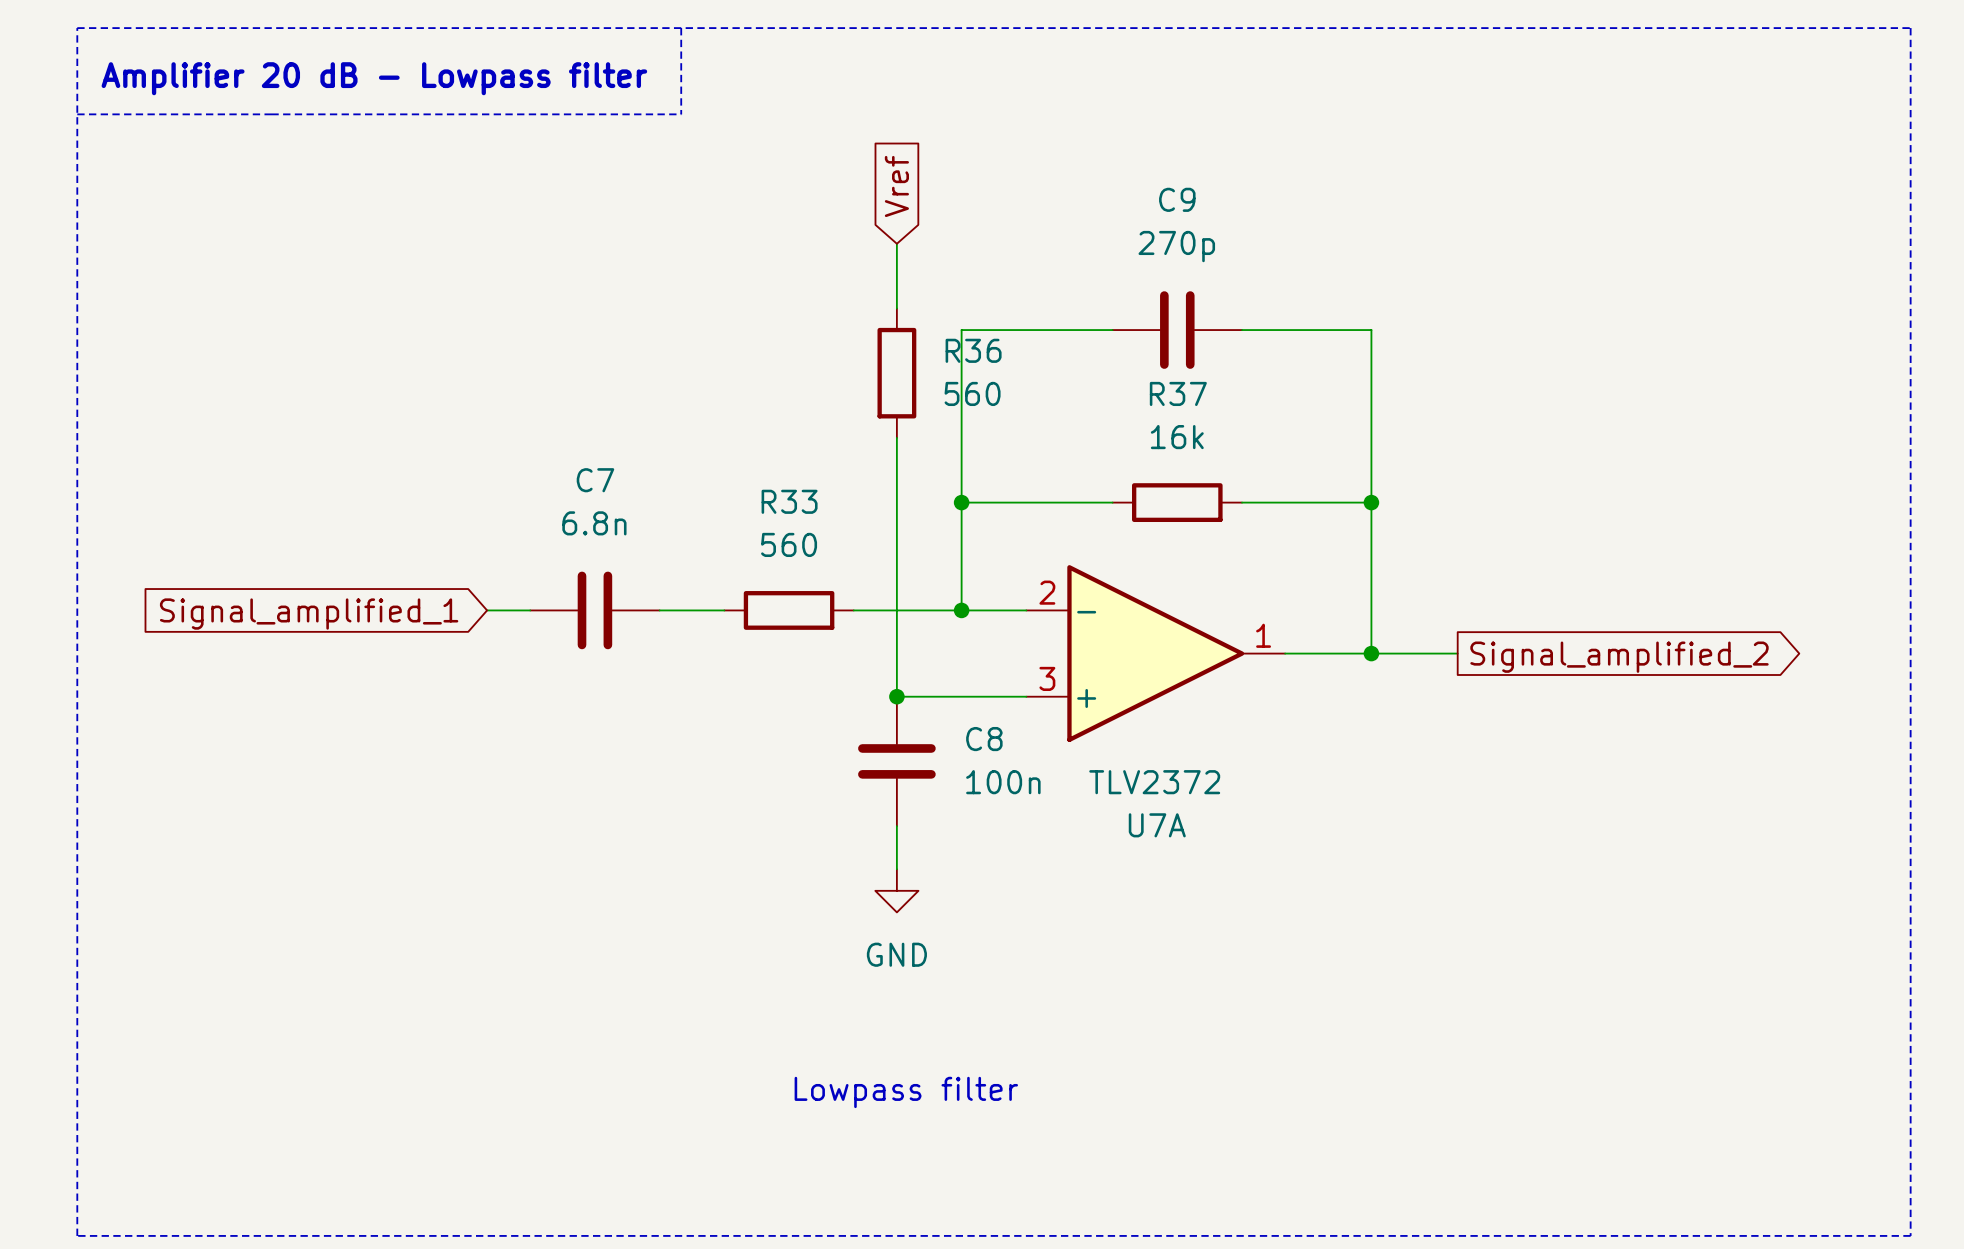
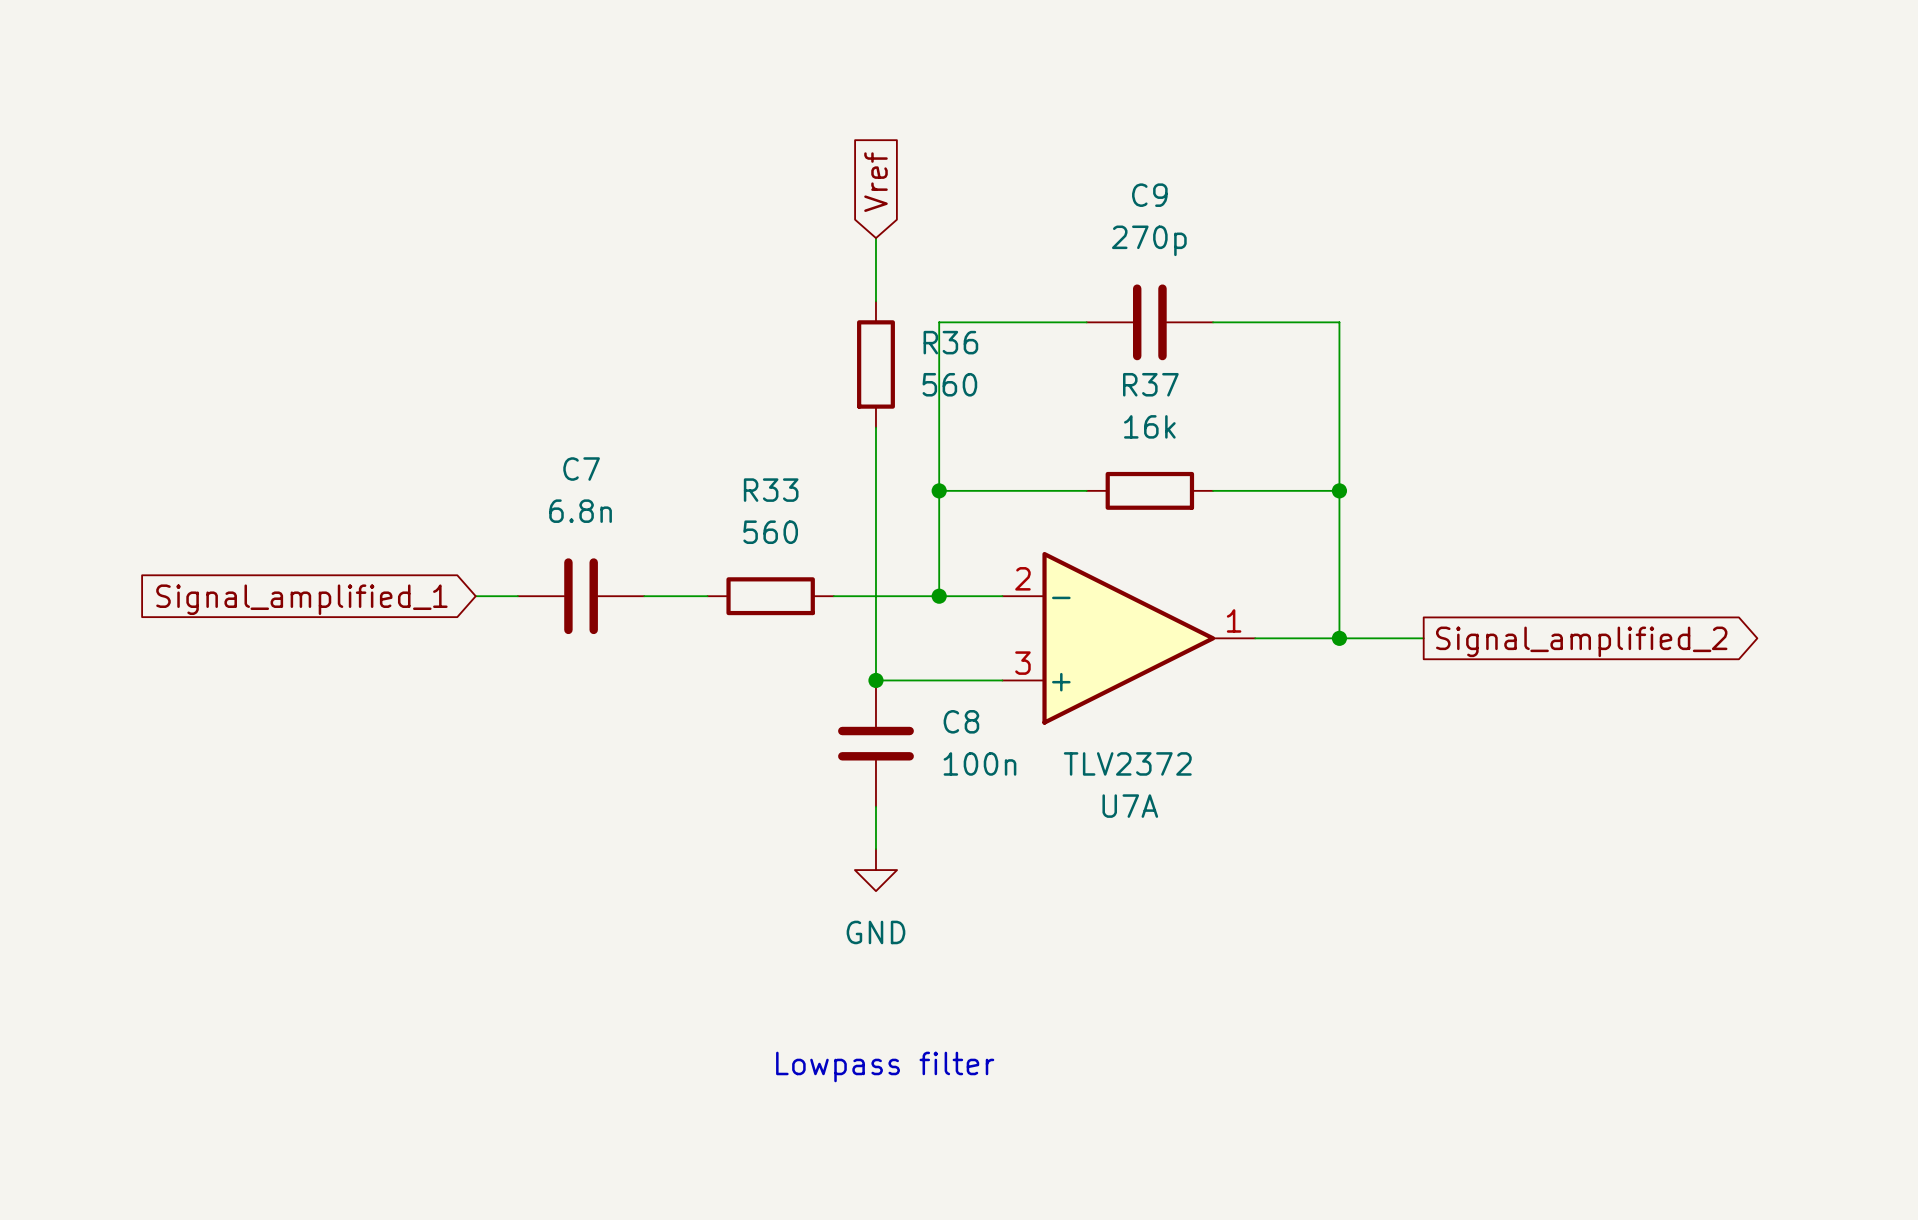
line: (77, 28) (1910, 28) (1910, 1235) (77, 1235) (77, 28) -> none
line: (681, 28) (681, 114) (77, 114) -> none
text: Amplifier 20 dB - Lowpass filter (374, 78) -> none

